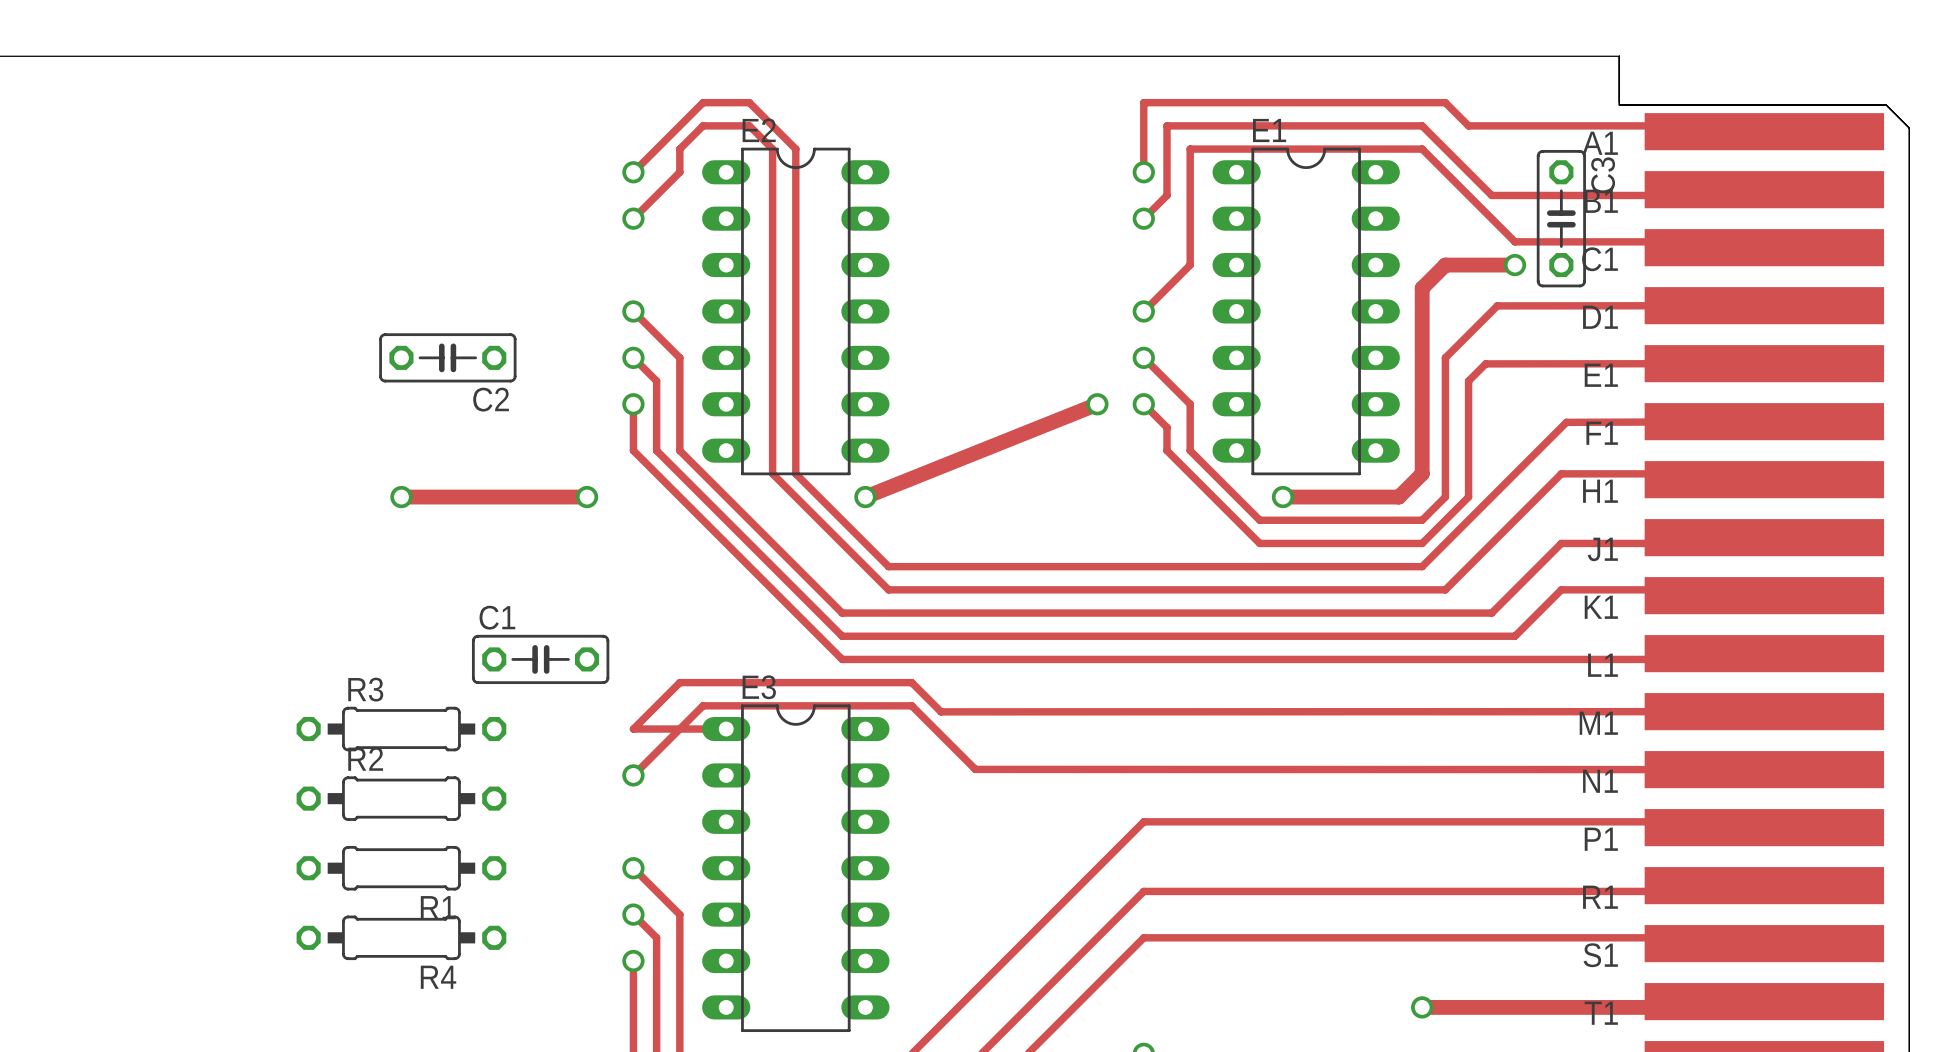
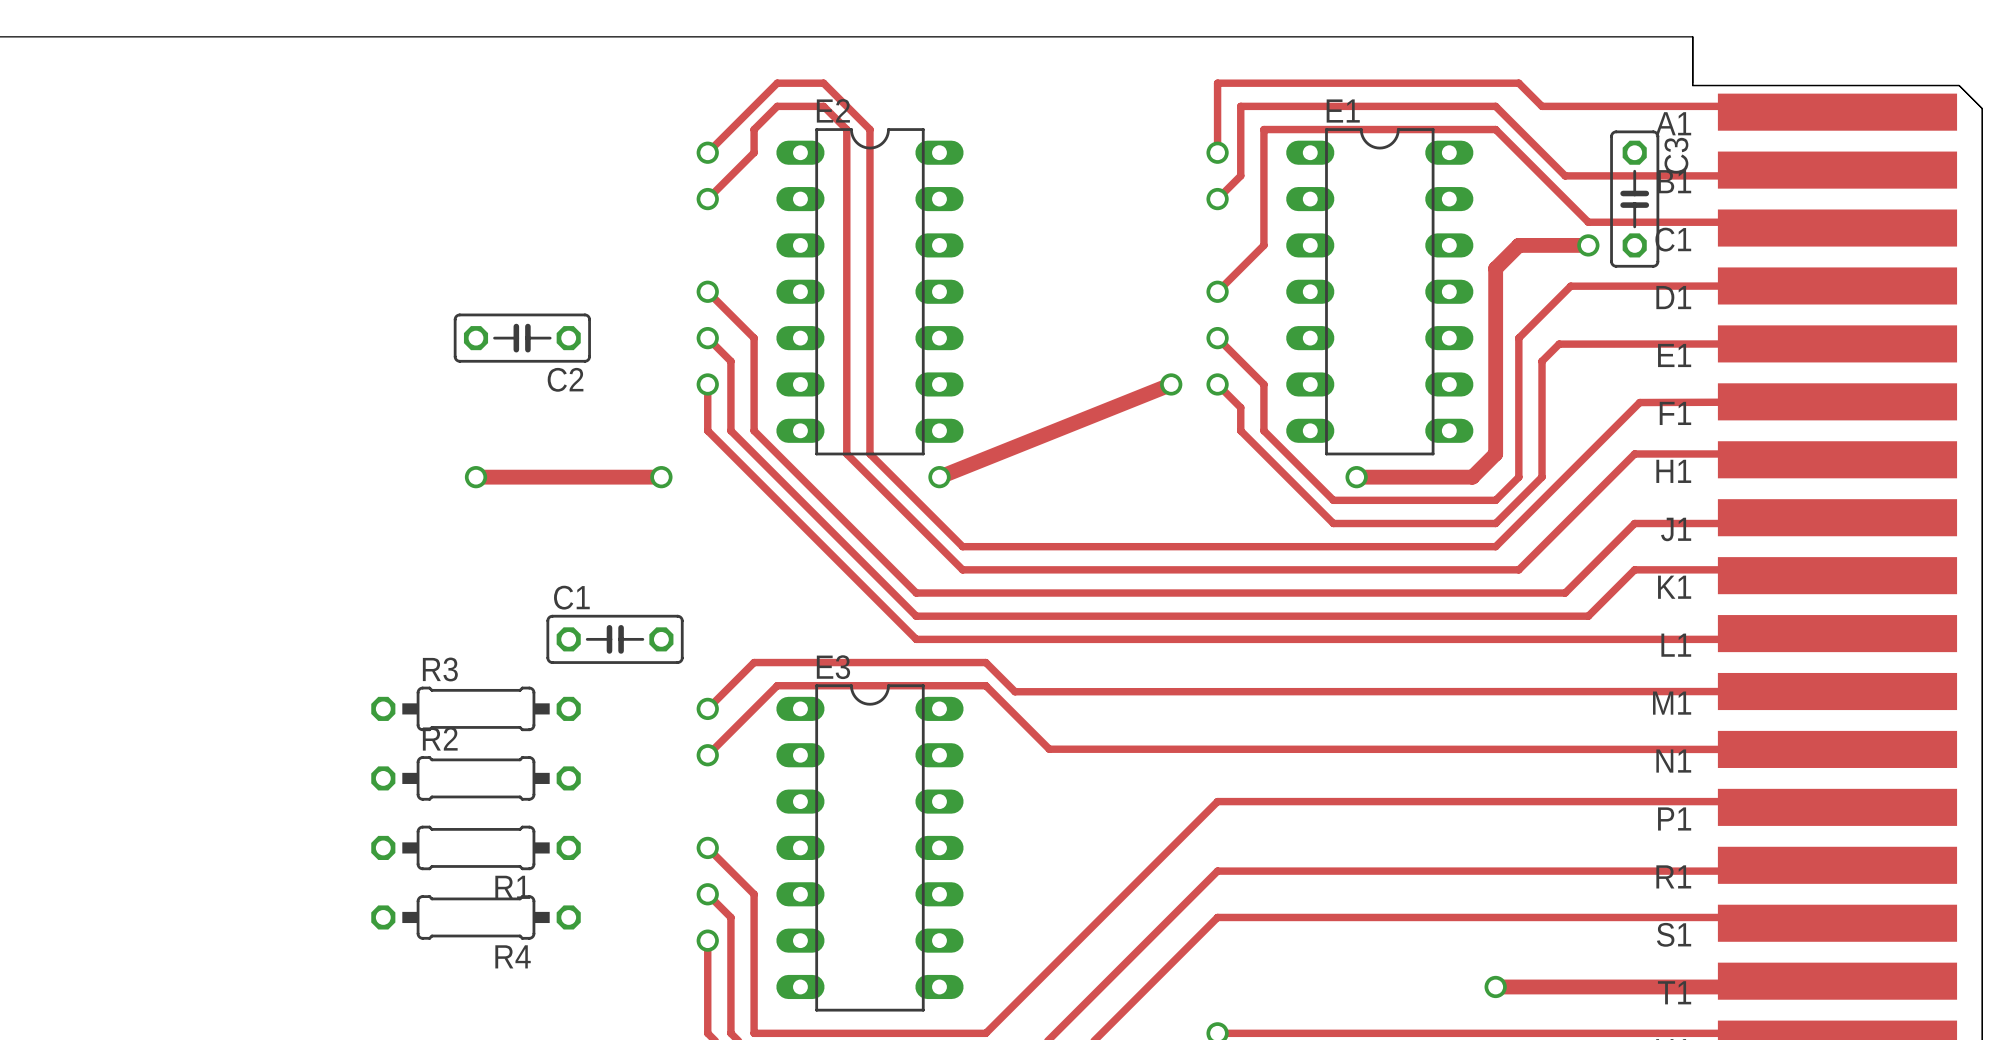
track: (633, 729) (726, 729) -> none
via: none -> (707, 708)

